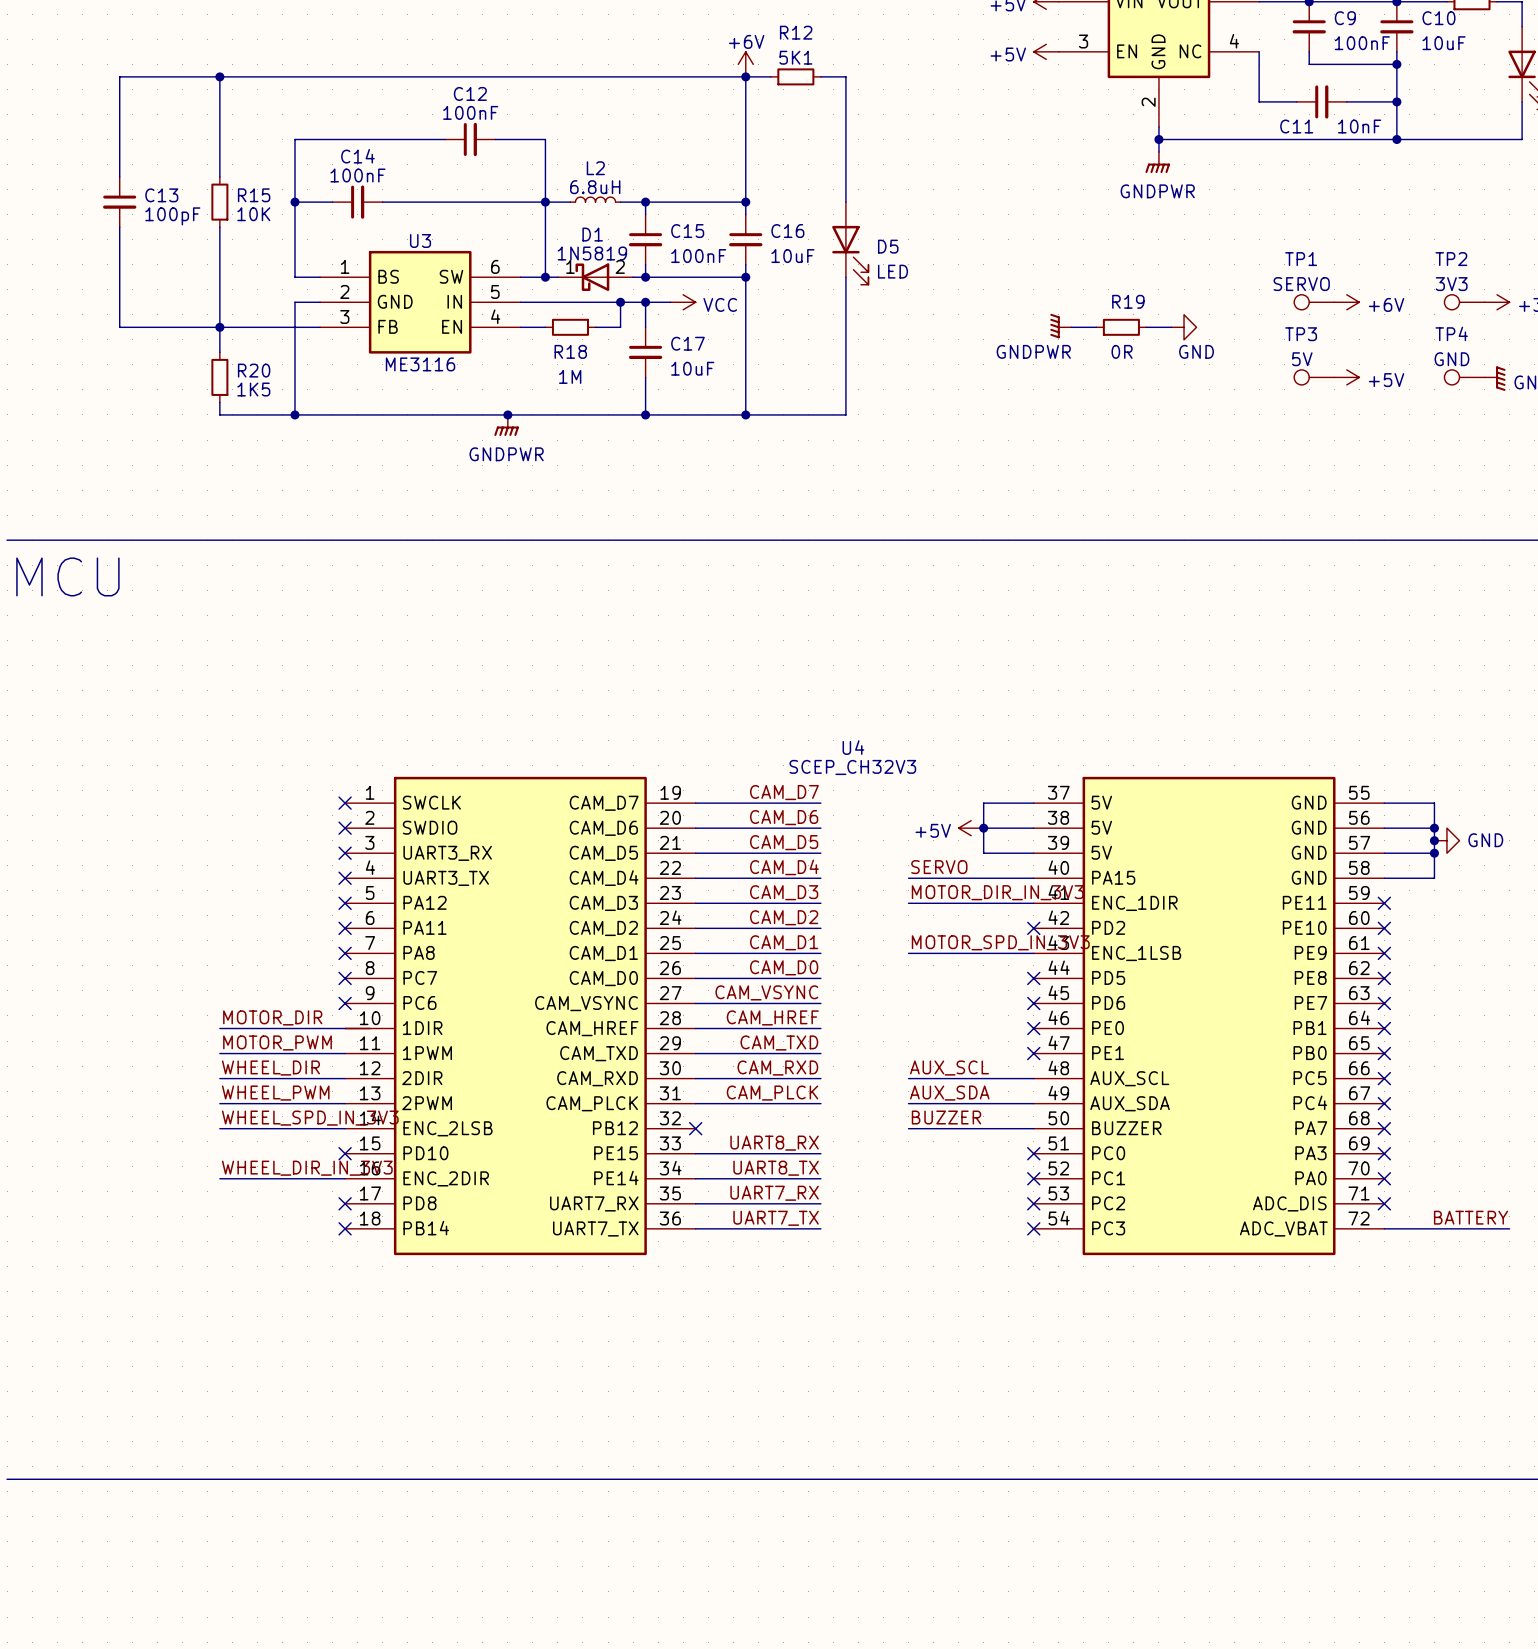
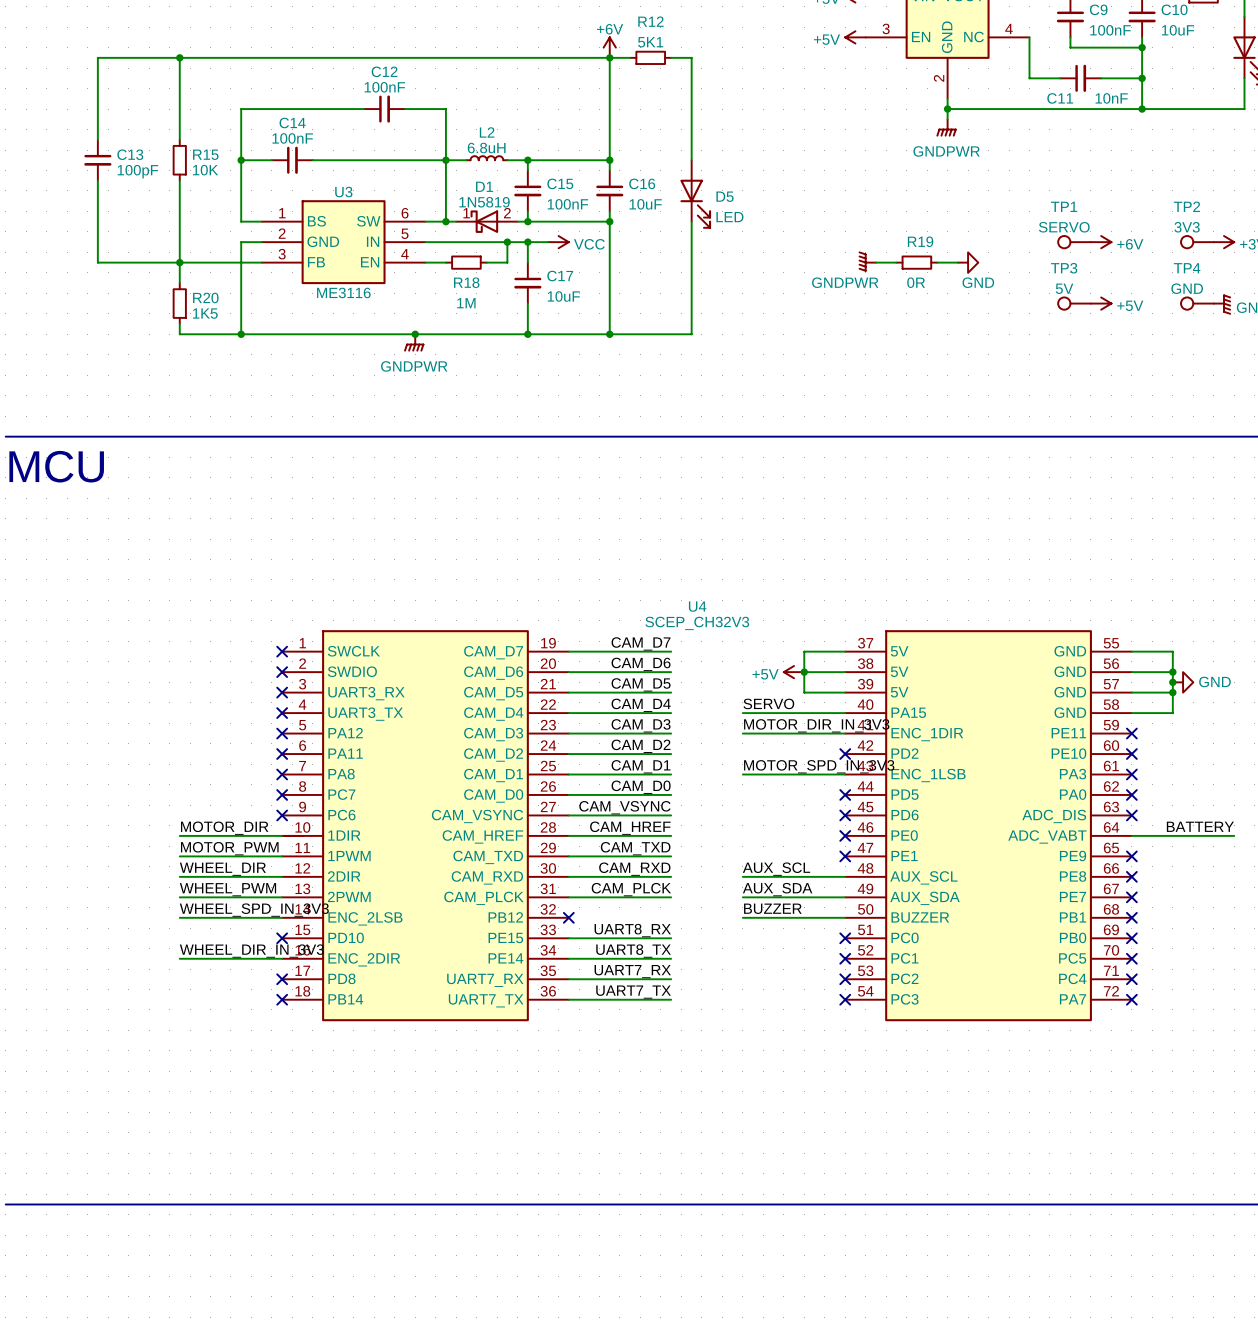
U4 symbol: [345, 776, 1385, 1256] -> [282, 630, 1132, 1022]
no-connect mark: (1384, 1028) -> none
label position: BATTERY (1471, 1217) -> BATTERY (1200, 826)
wire: (1384, 1228) (1509, 1228) -> (1131, 835) (1234, 835)
no-connect mark: none -> (1131, 999)

